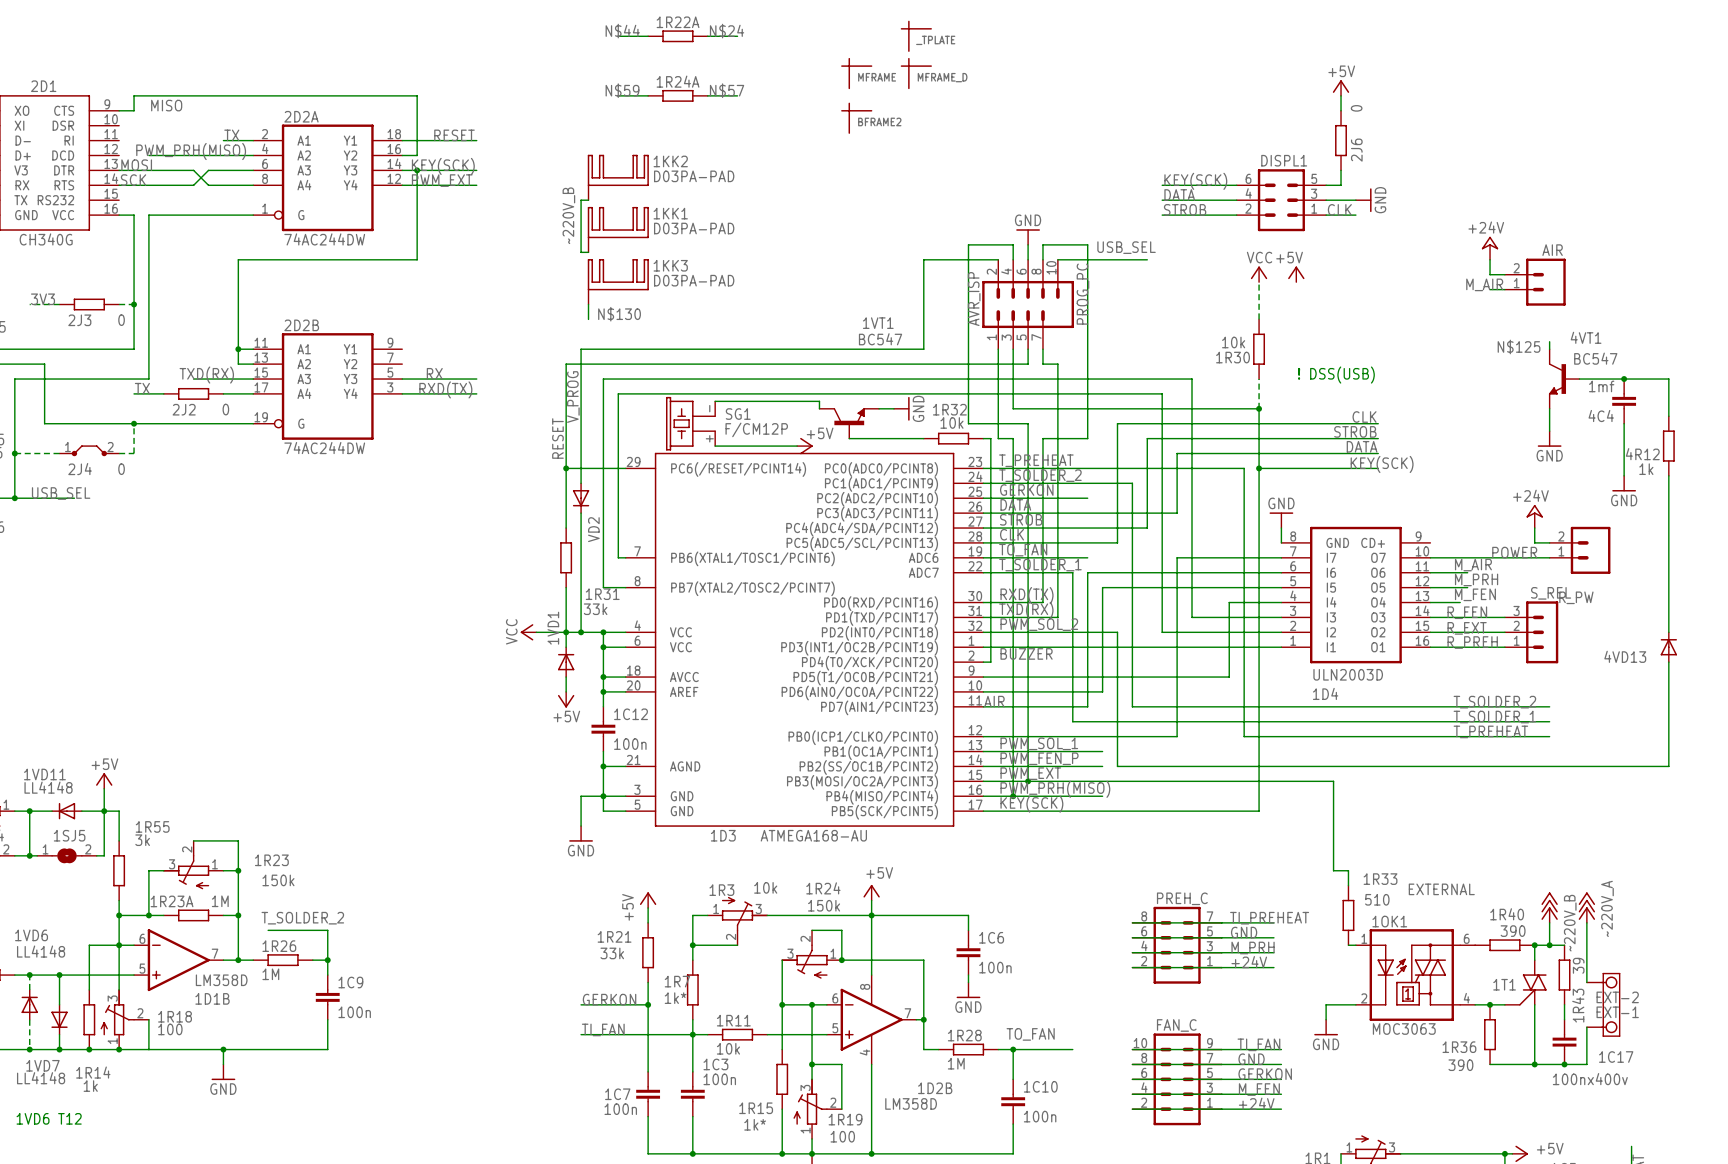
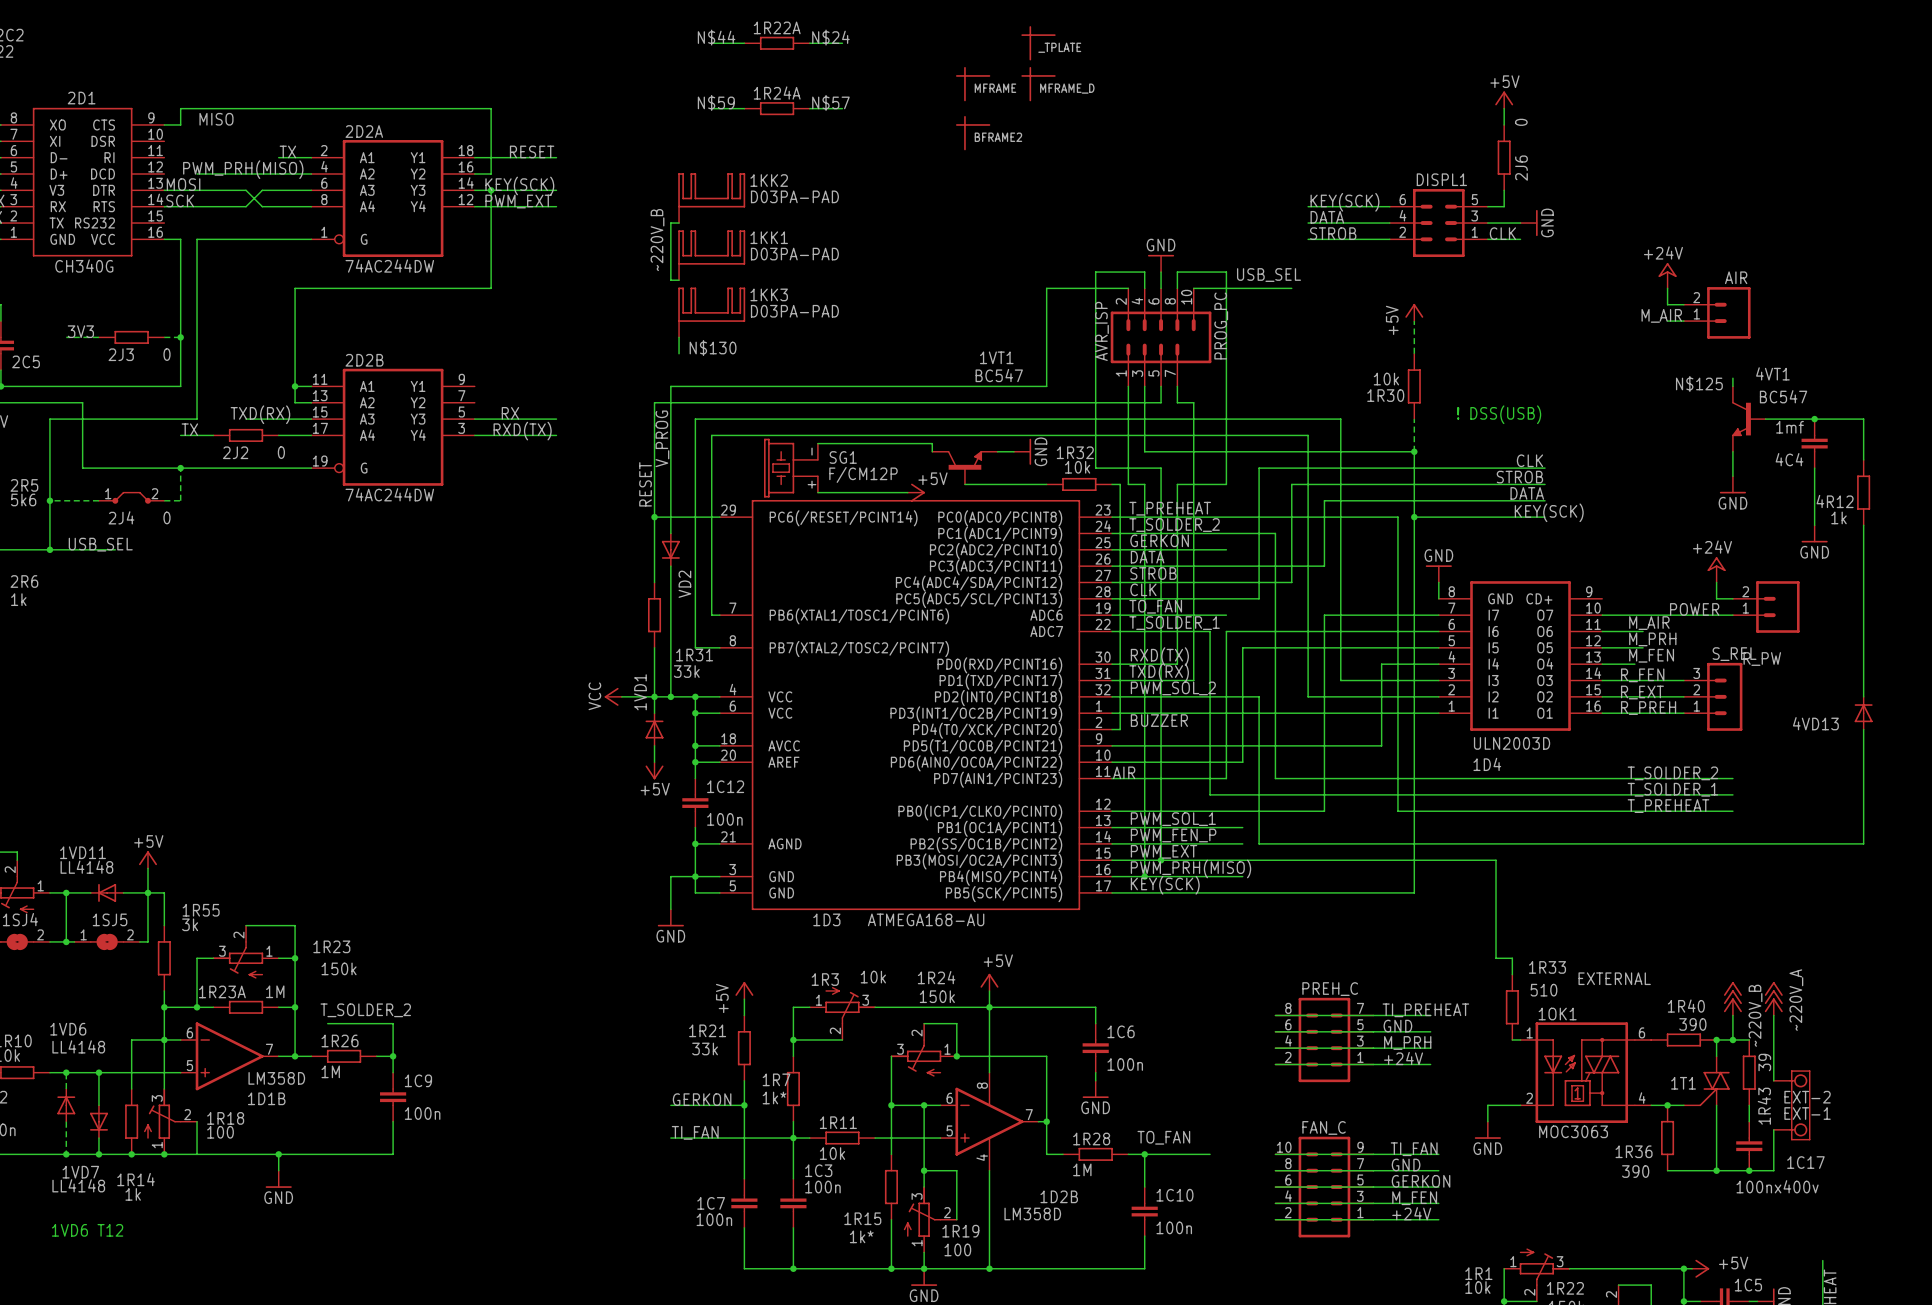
power symbol text rotation: 0° (1289, 257) -> 90° counterclockwise (1392, 320)
power symbol: VCC (1259, 274) -> none
power symbol position: +5V (1296, 274) -> +5V (1414, 312)

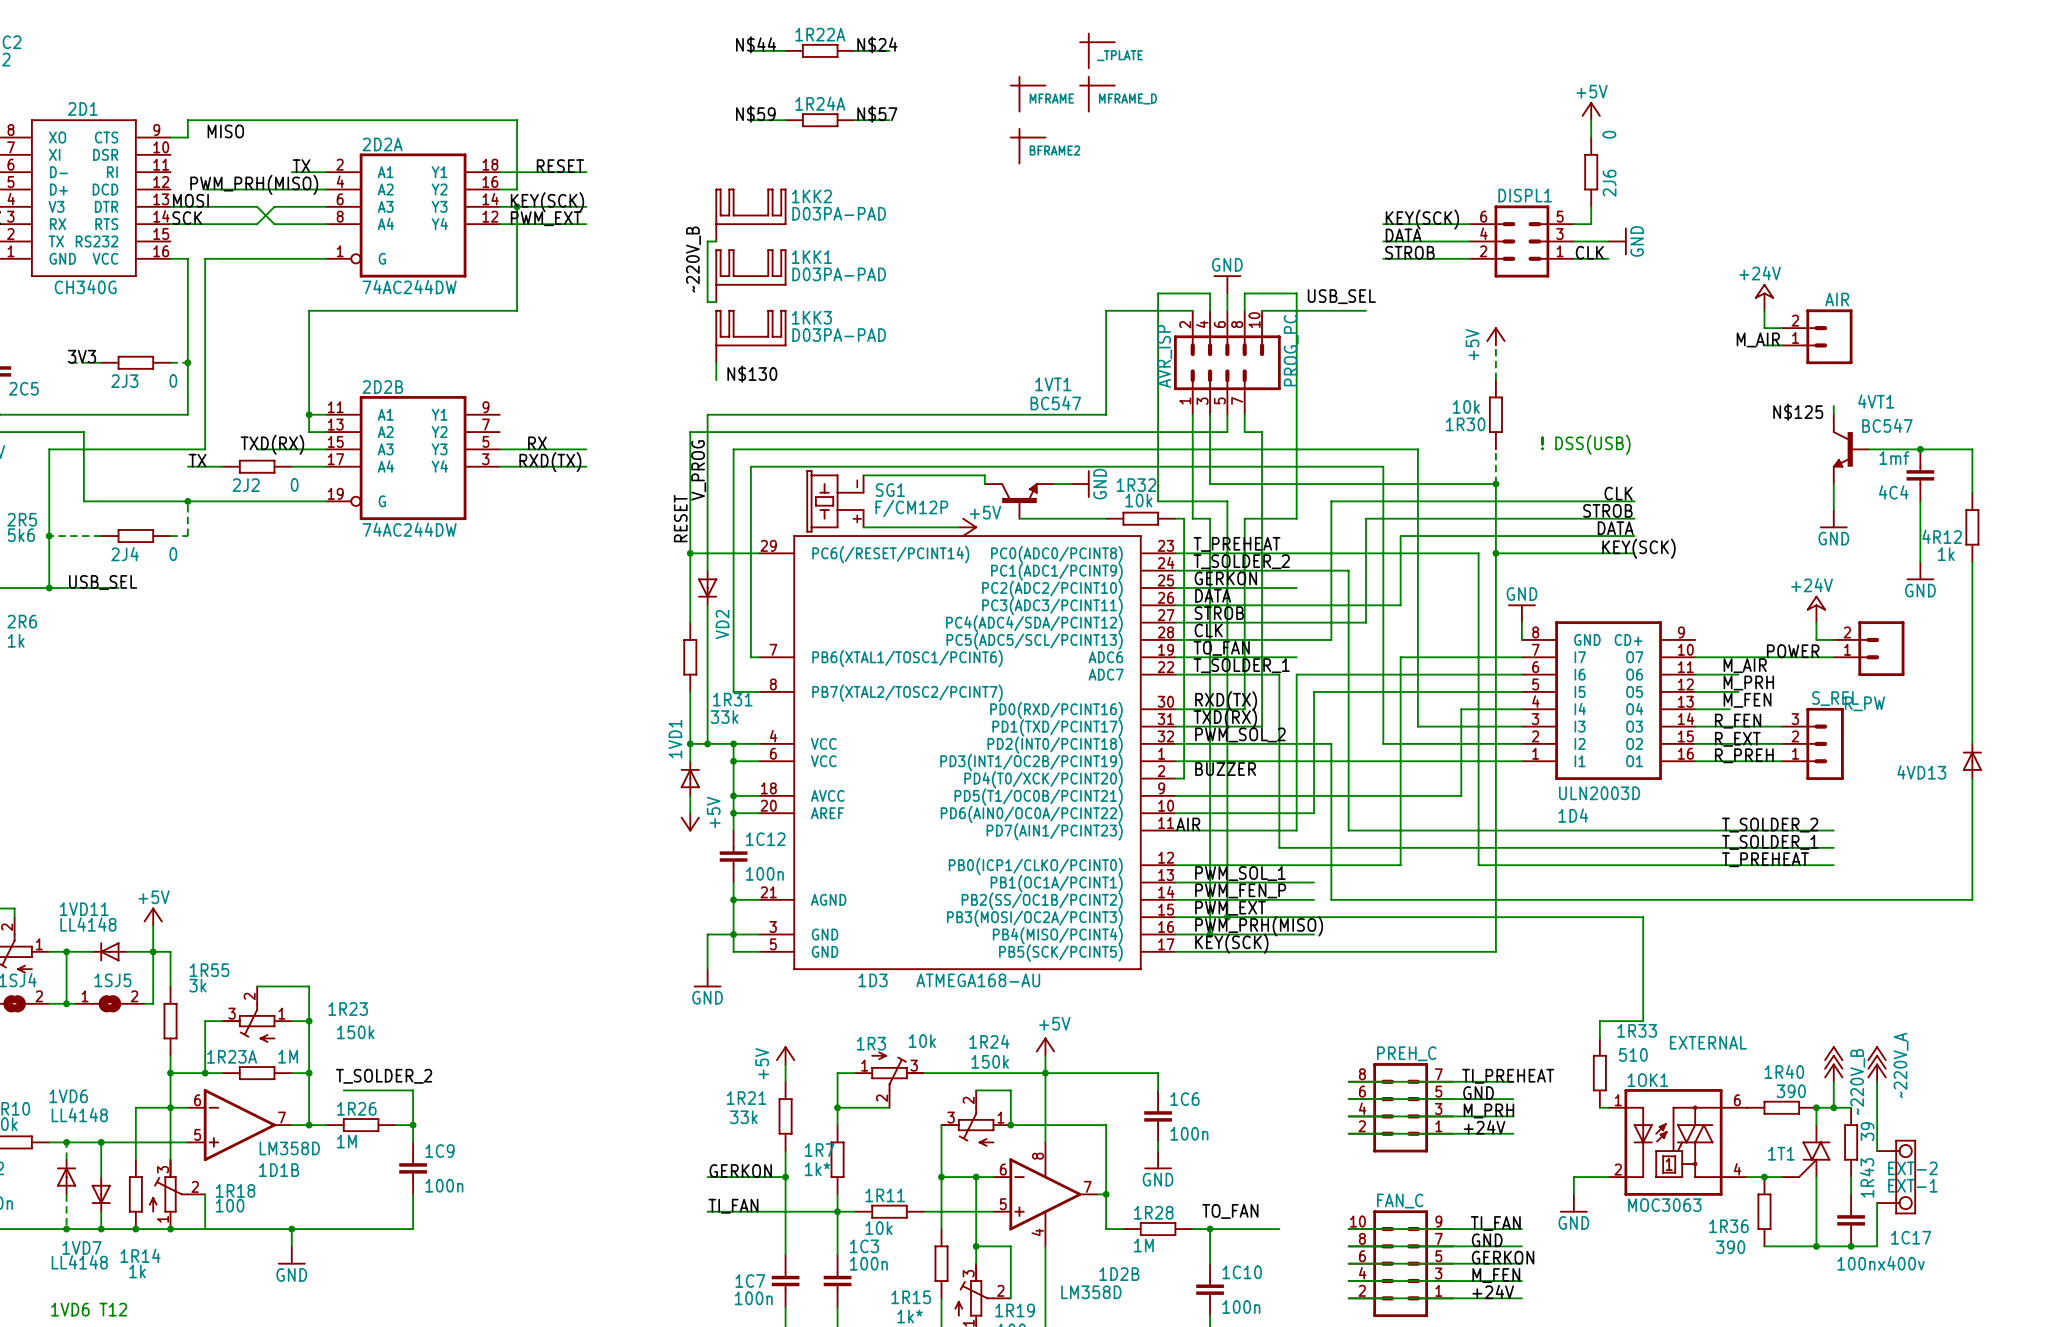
2J4 symbol: [98, 492, 165, 504] -> [101, 529, 171, 543]
power symbol: VCC (613, 696) -> none
wire: (621, 696) (654, 696) -> none
power symbol text rotation: 0° (655, 789) -> 90° counterclockwise (713, 812)
wire: (1496, 860) (1496, 958) (1512, 958) -> (1582, 917) (1643, 917) (1643, 1021) (1599, 1021)

